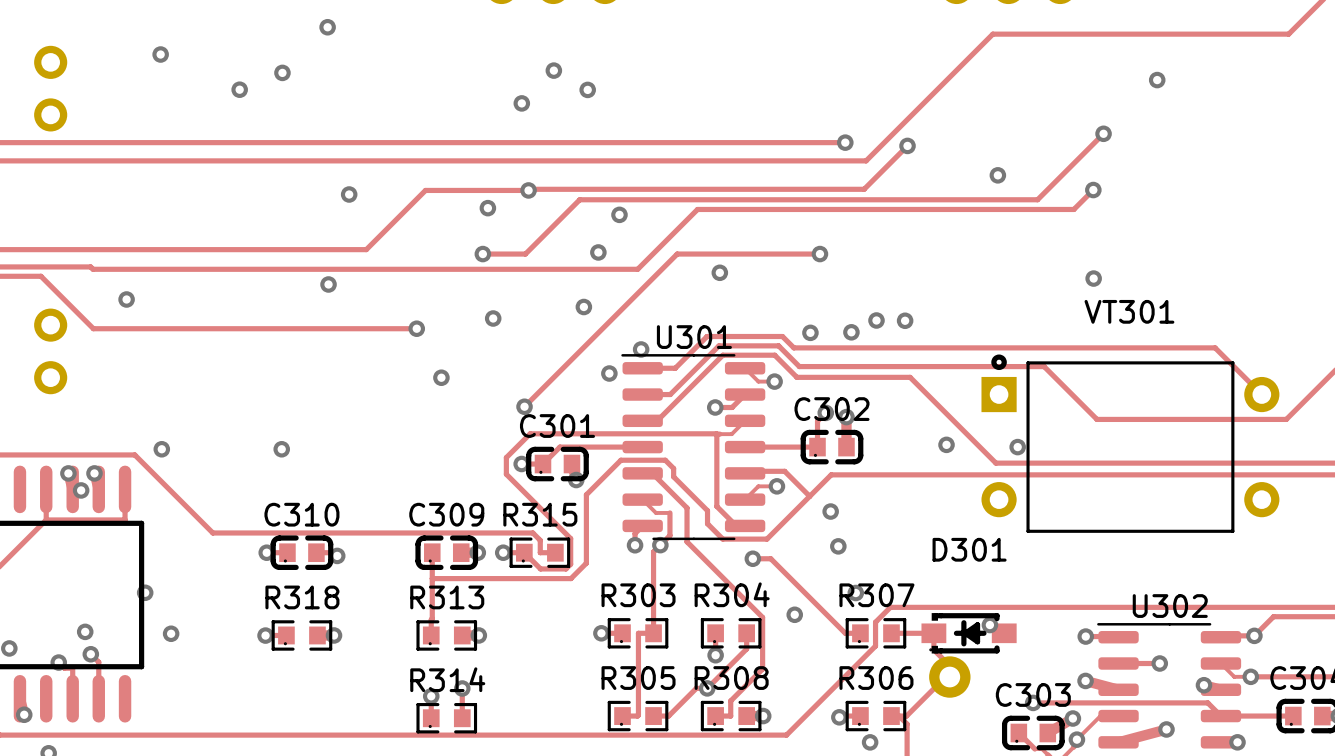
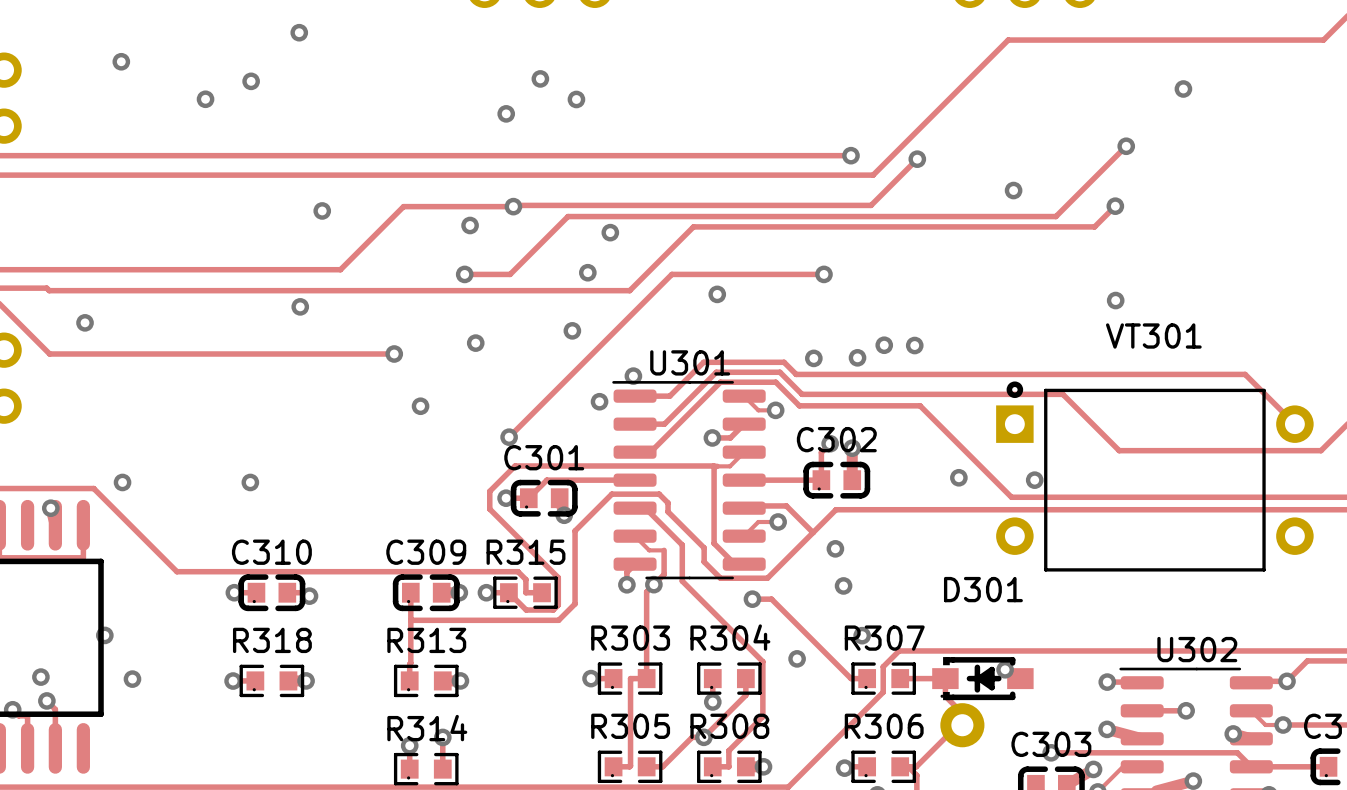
via: (68, 473) -> none
via: (81, 490) -> none

